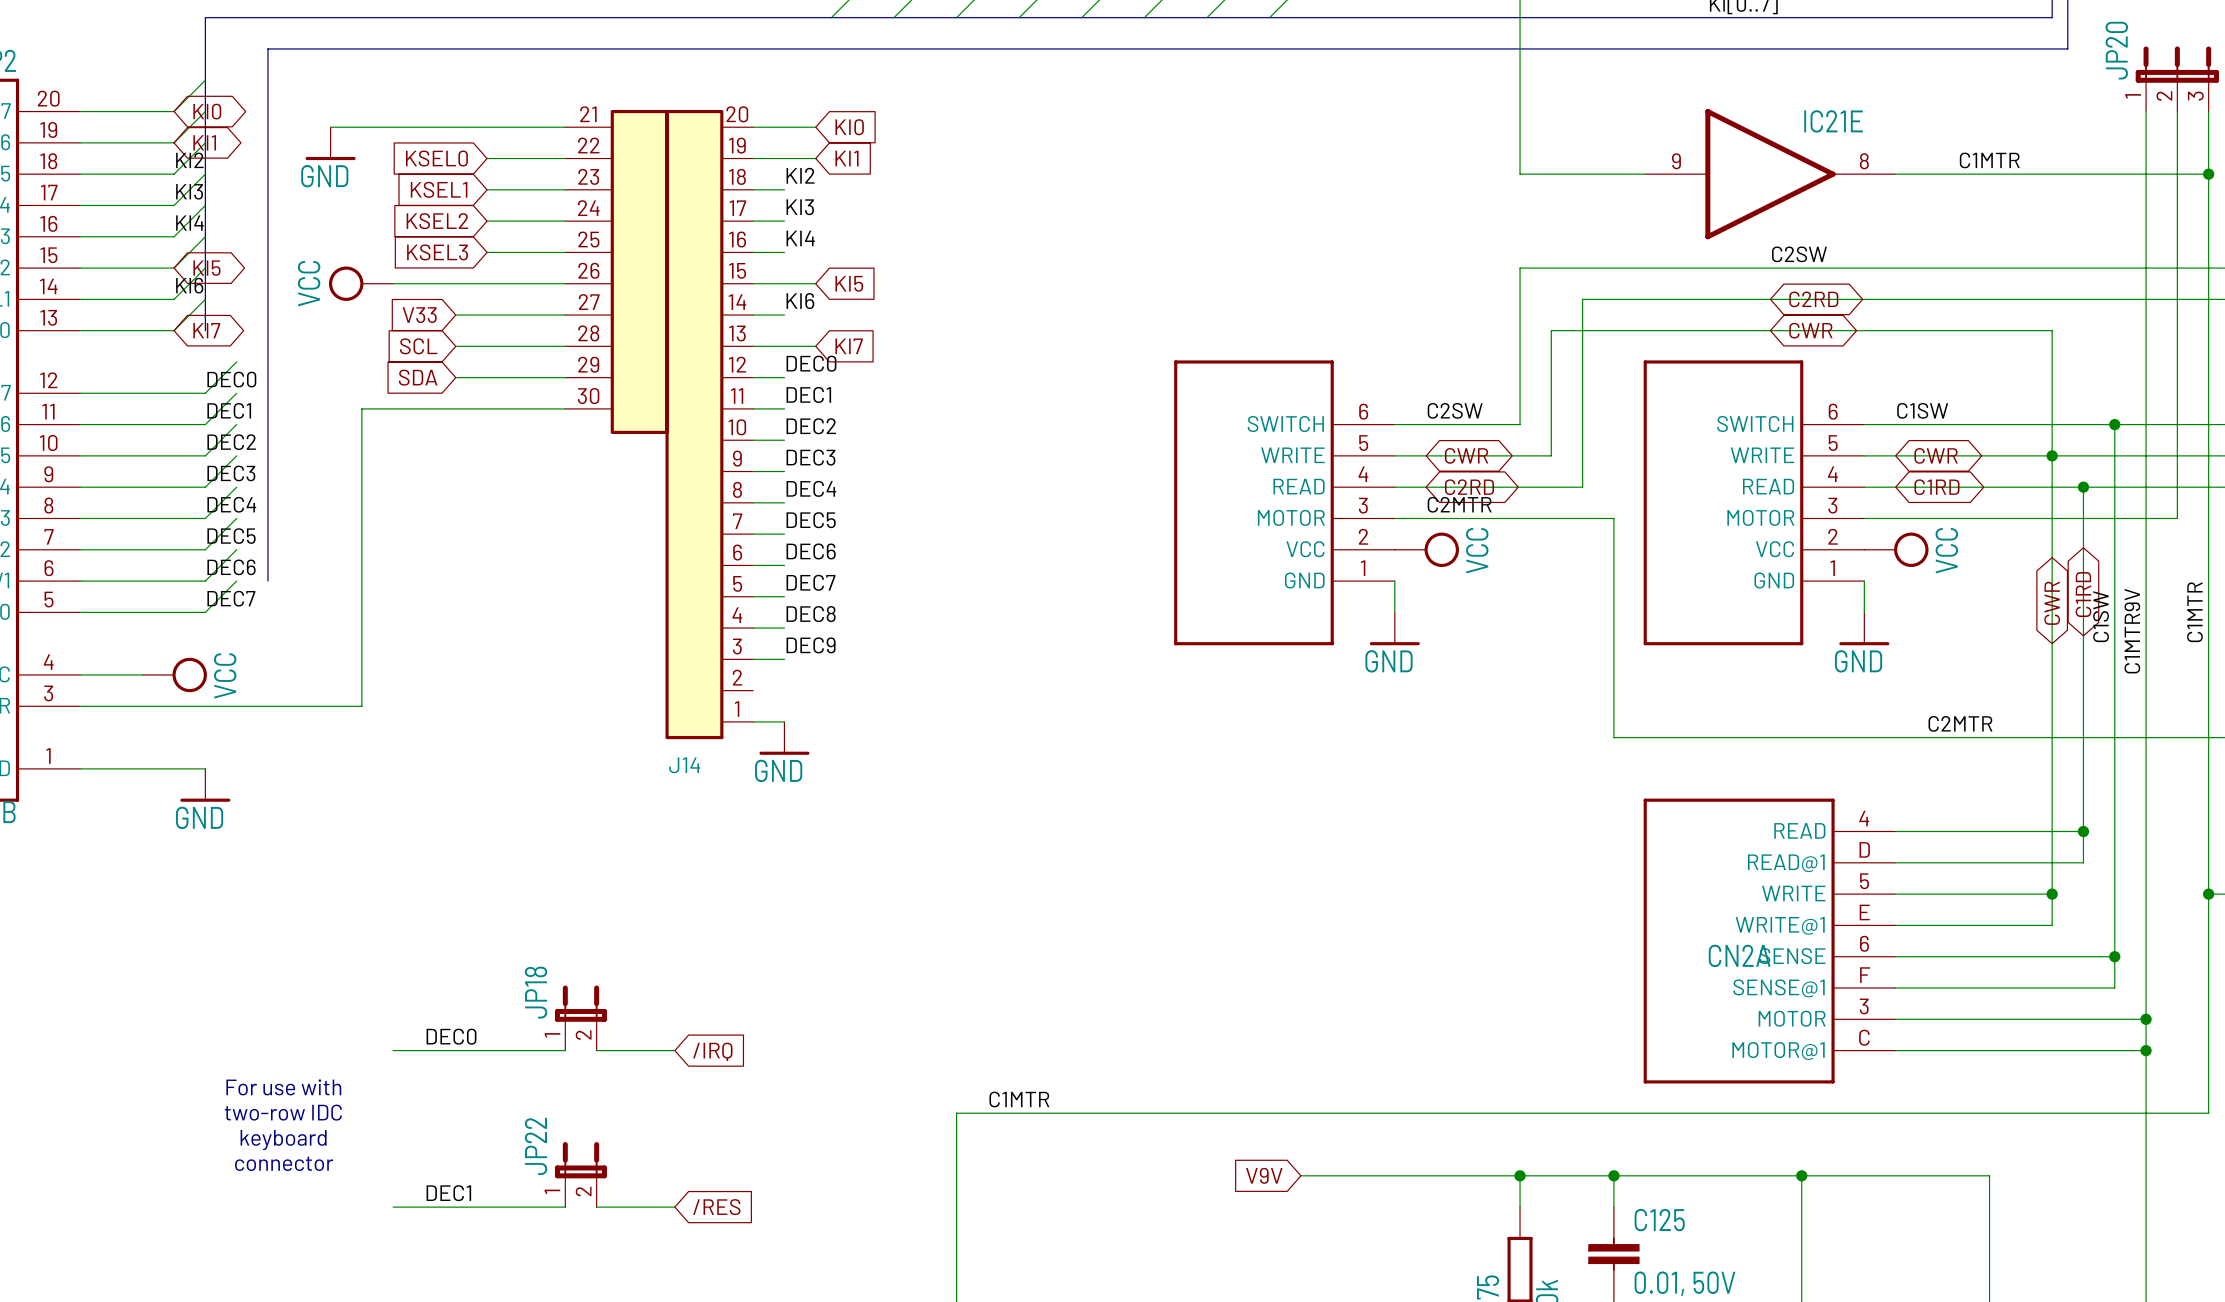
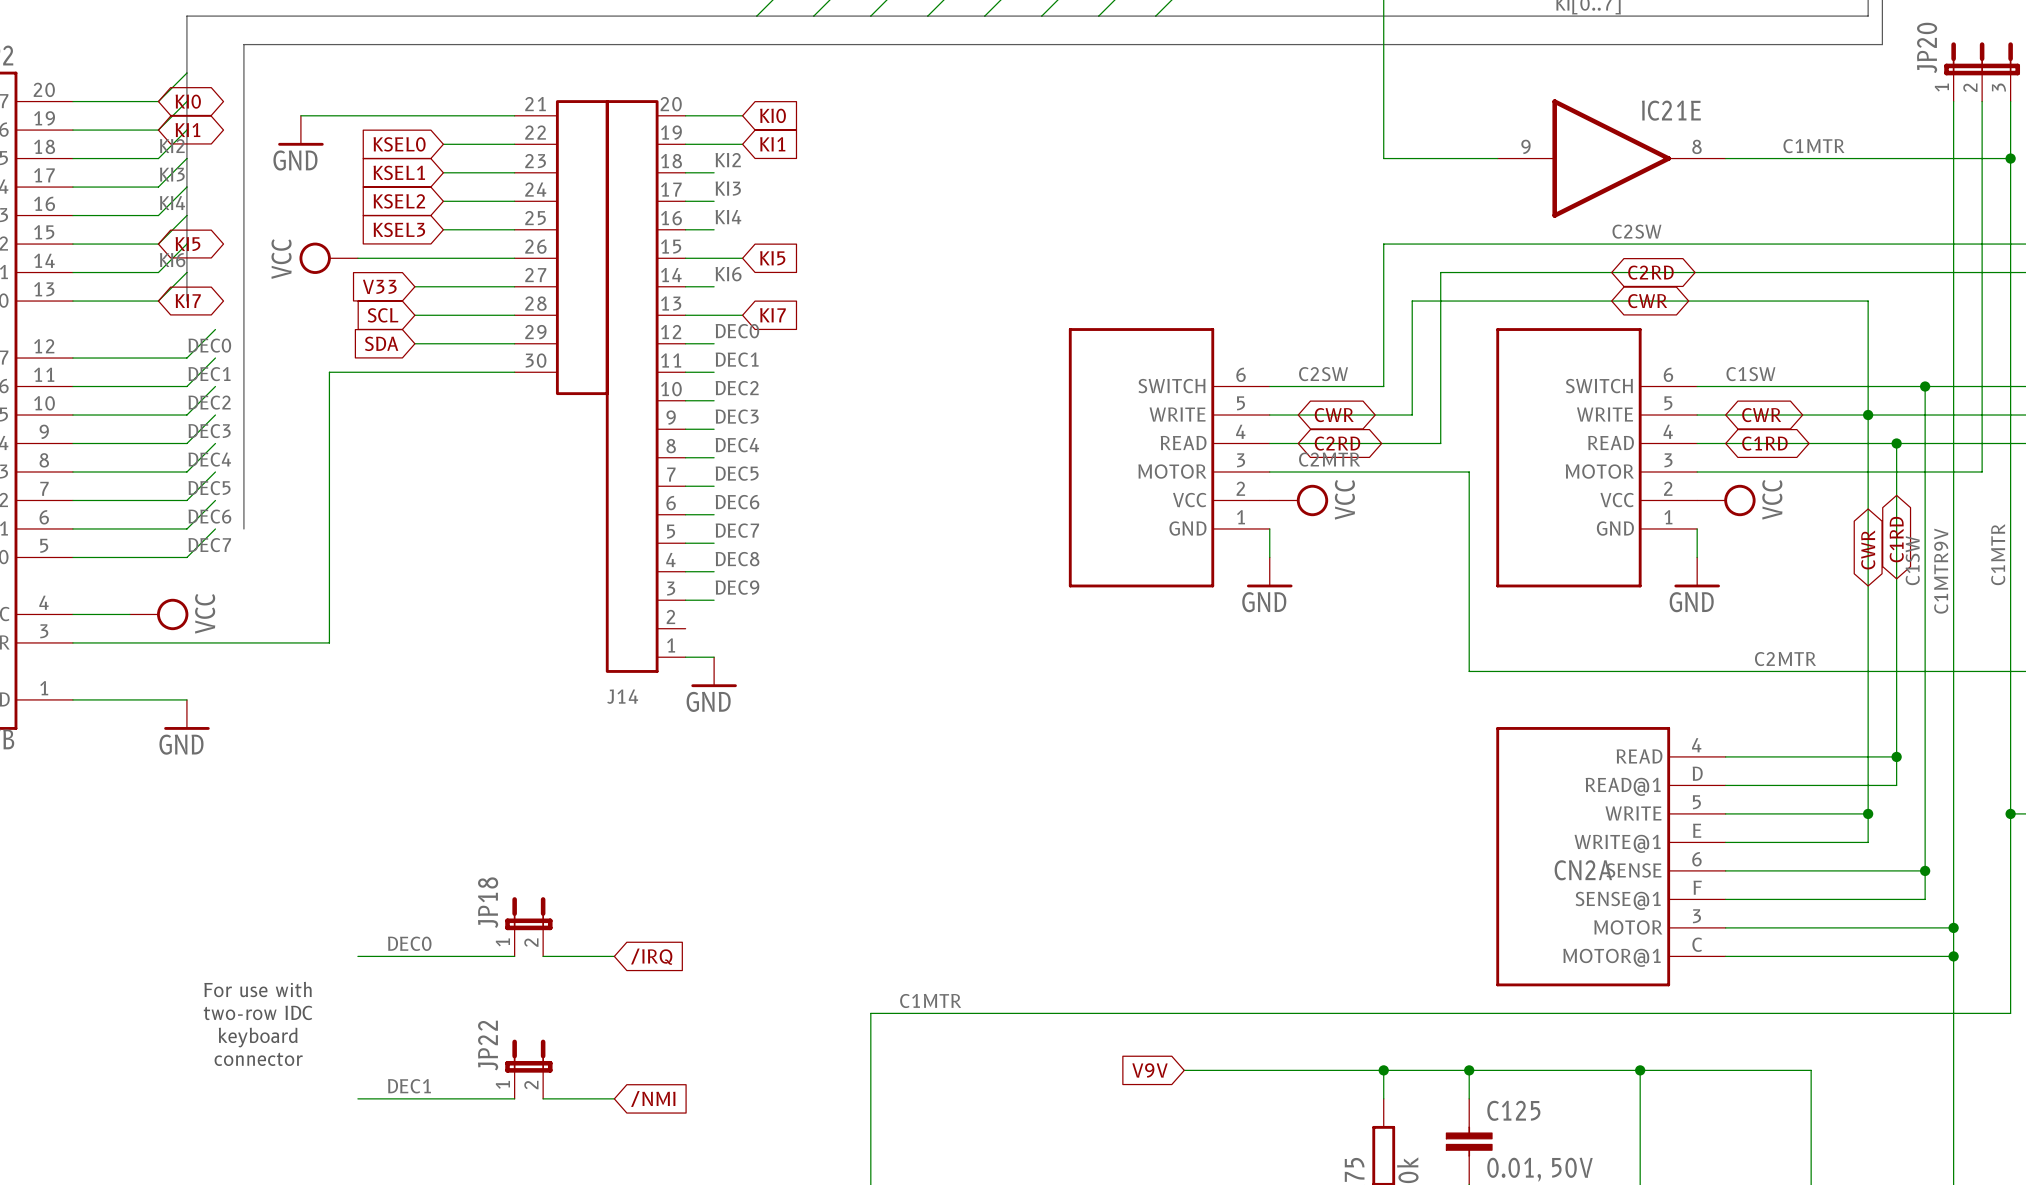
global label: /RES (716, 1207) -> /NMI (653, 1098)

